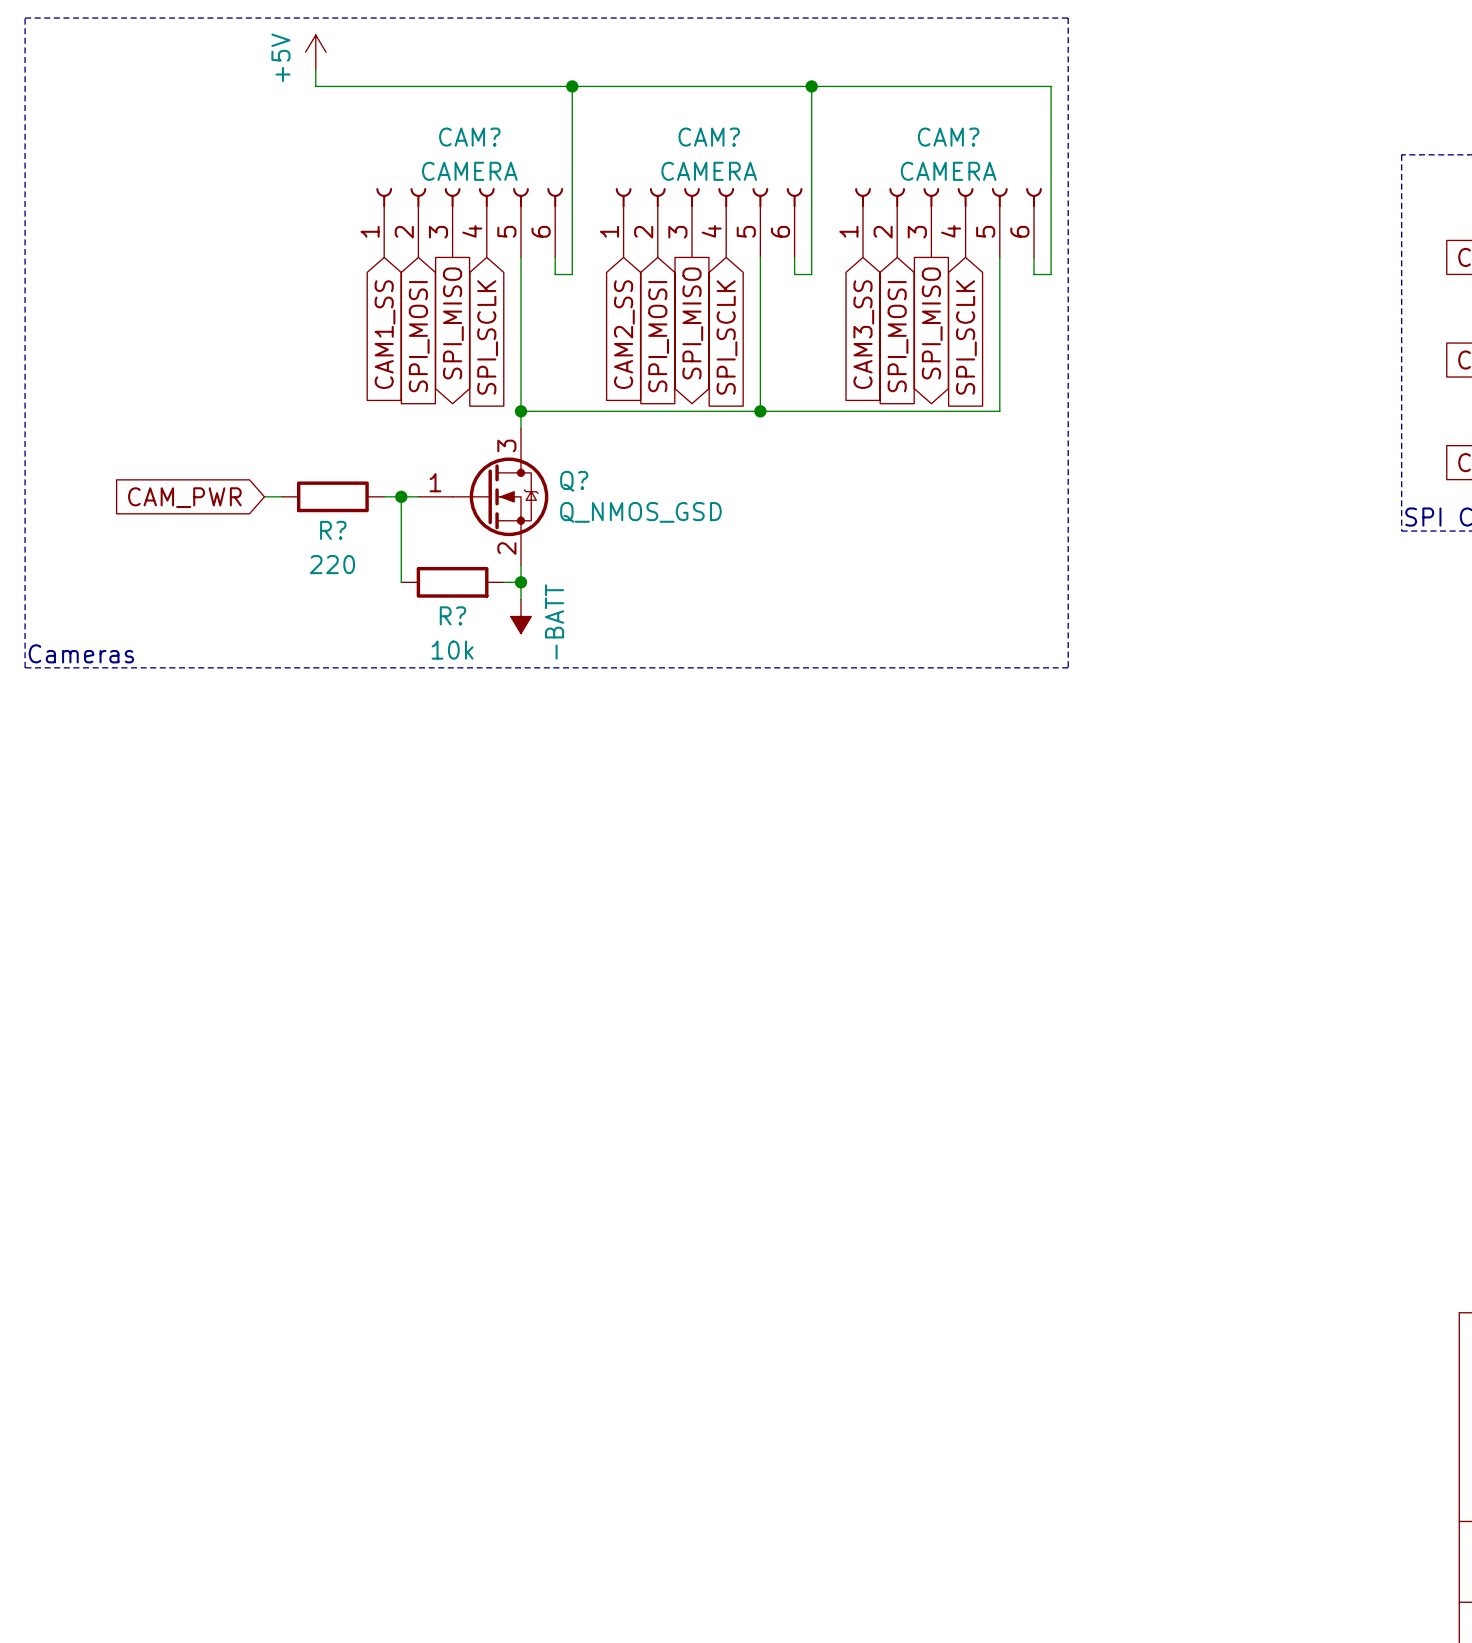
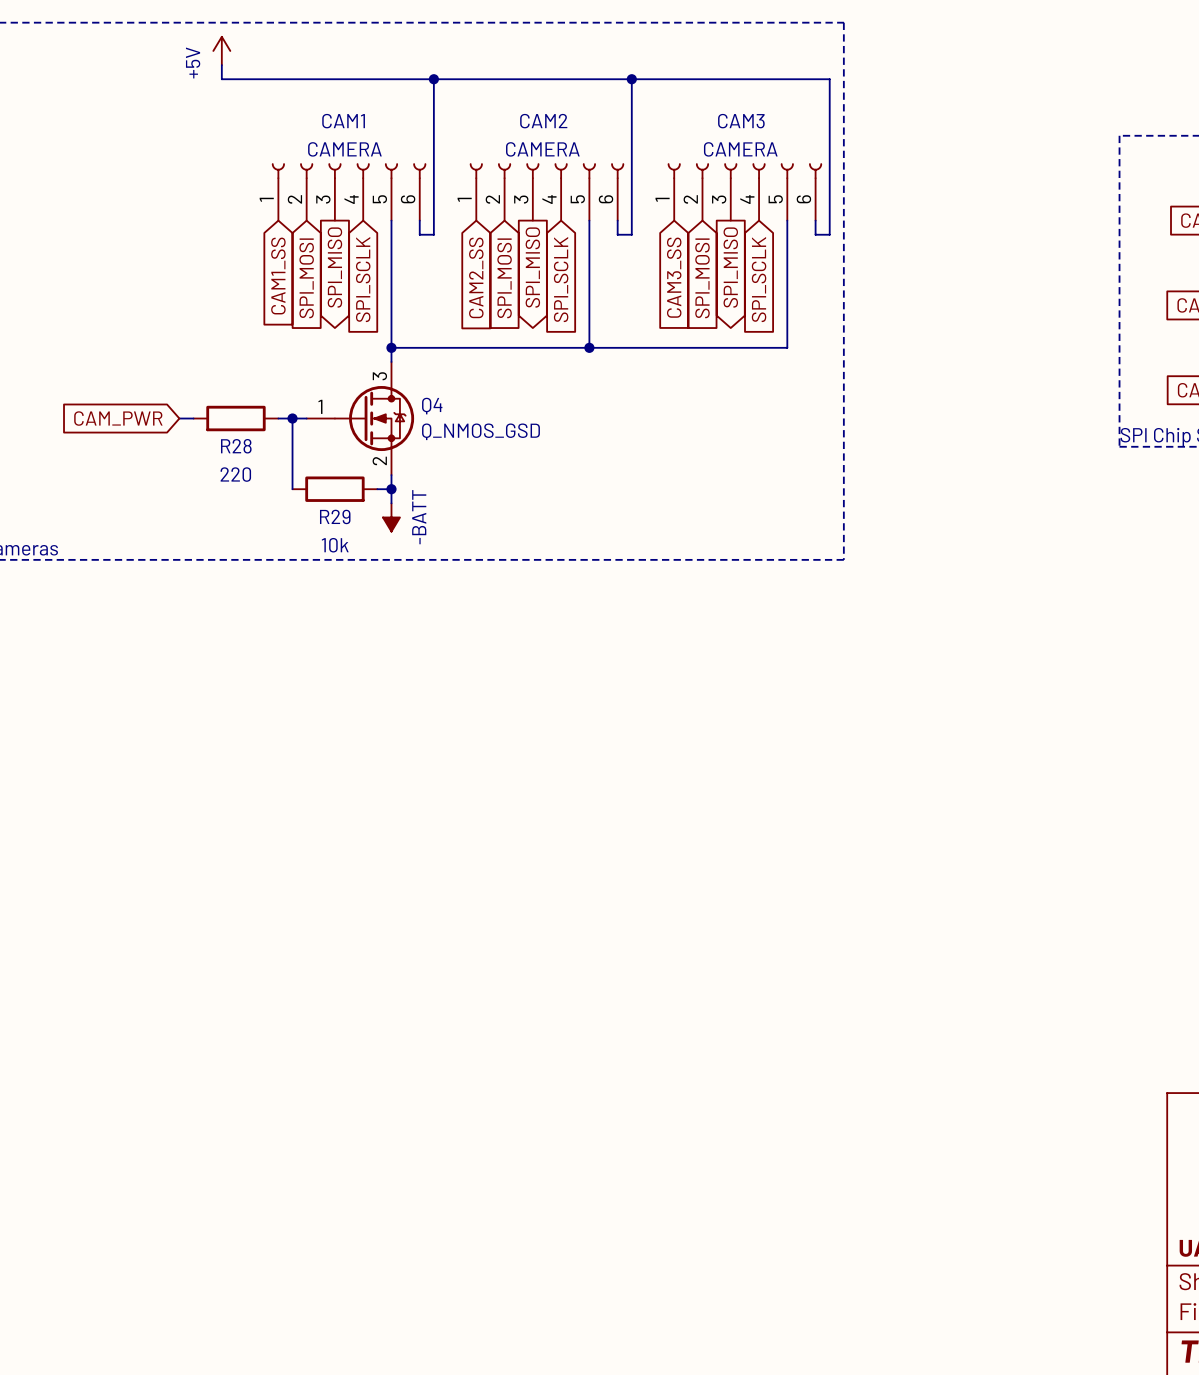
CAM? name: CAM? (469, 137) -> CAM1 (343, 121)
CAM? name: CAM? (709, 137) -> CAM2 (543, 121)
CAM? name: CAM? (948, 137) -> CAM3 (741, 121)
Q? name: Q? (574, 481) -> Q4 (432, 406)
R? name: R? (333, 530) -> R28 (236, 446)
R? name: R? (452, 615) -> R29 (335, 516)

